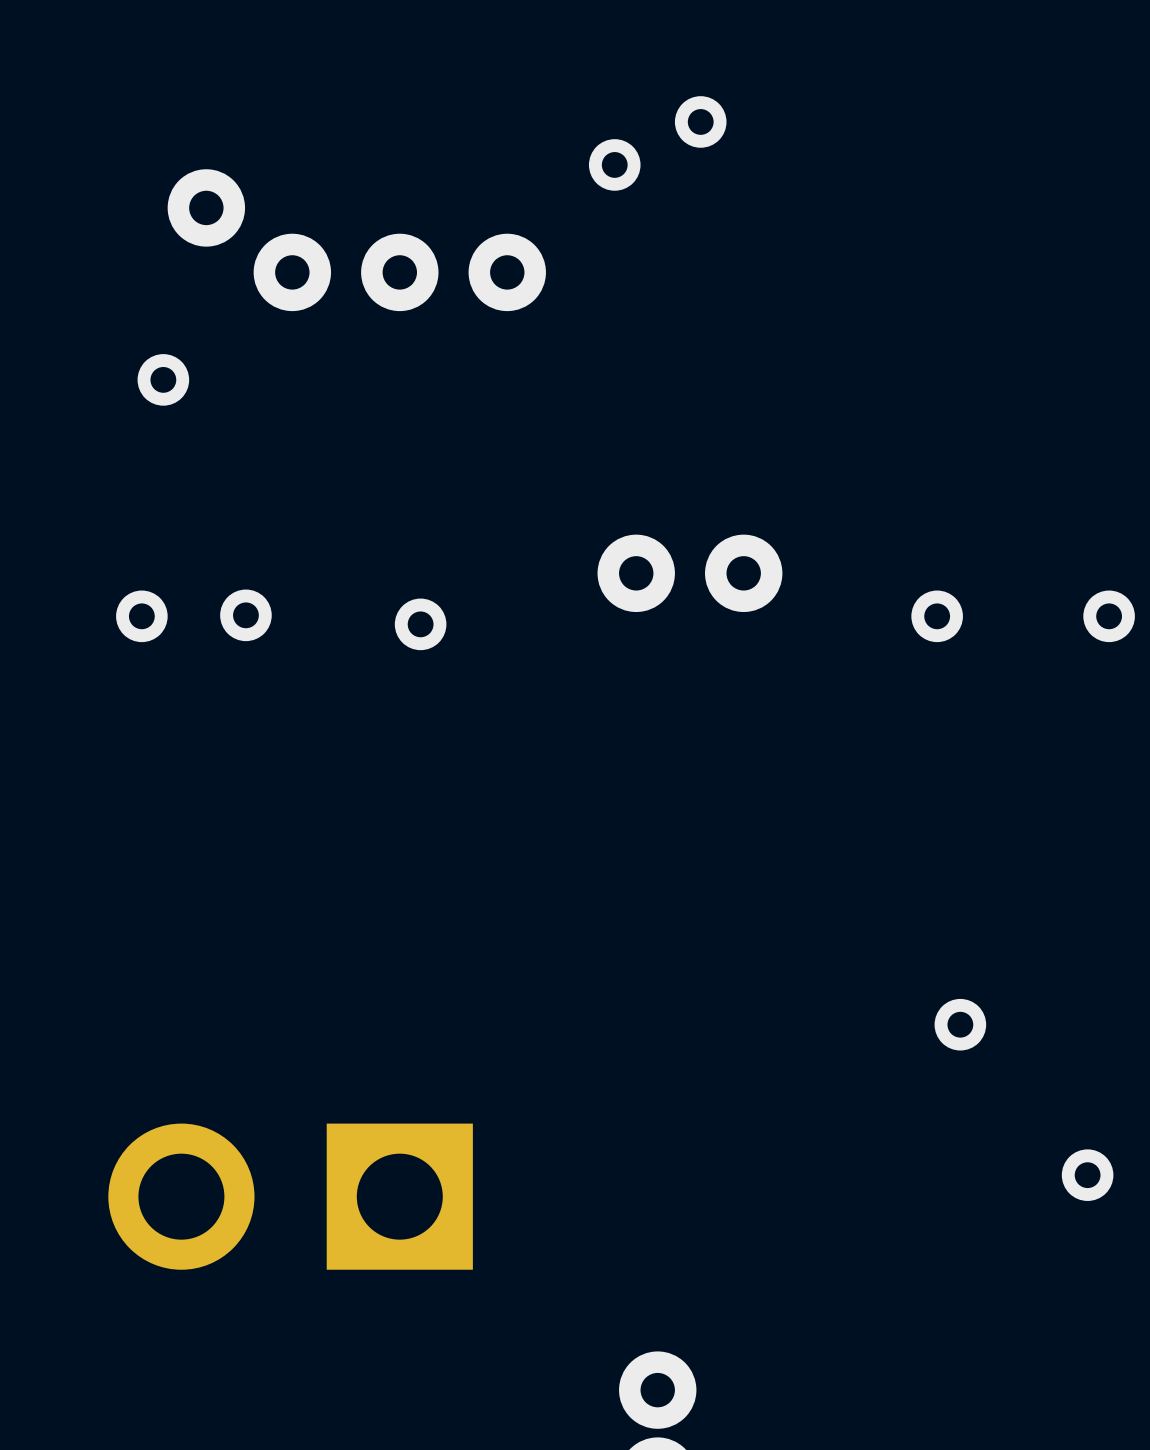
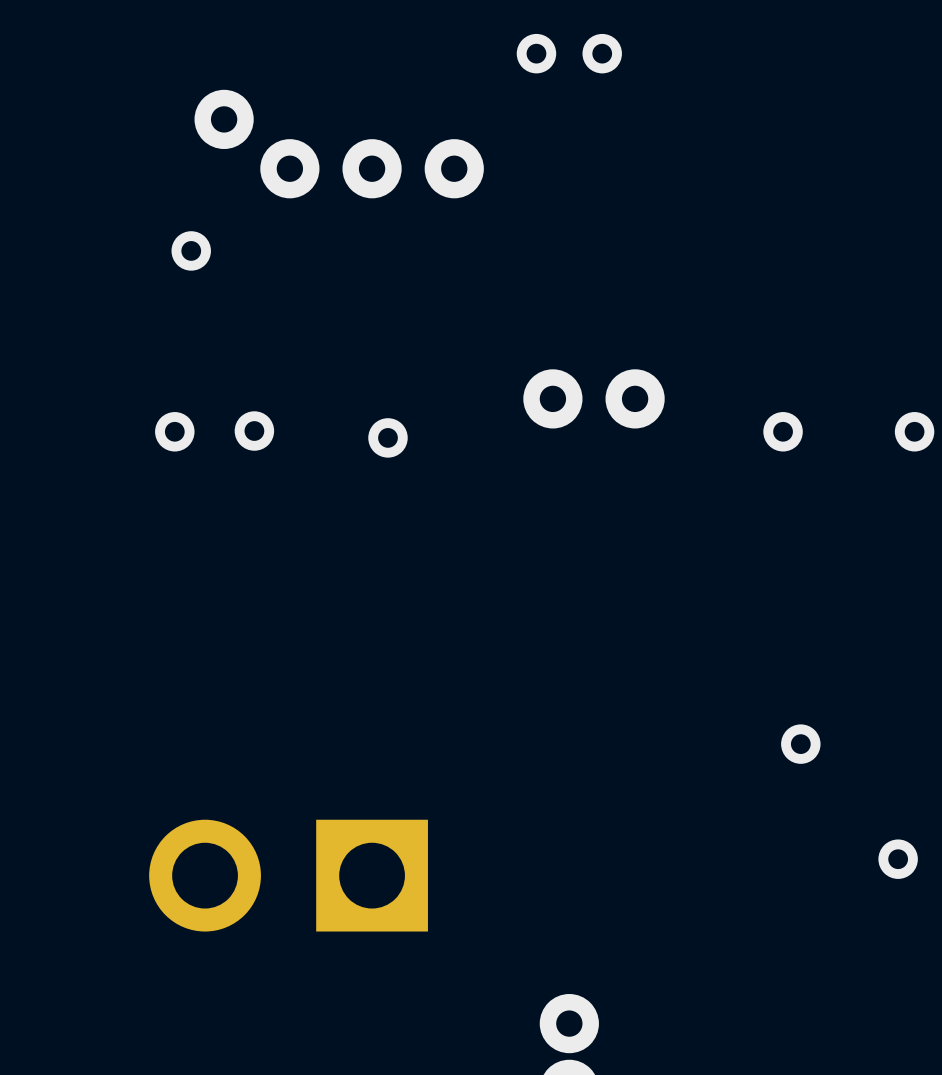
via position: (614, 164) -> (536, 53)

